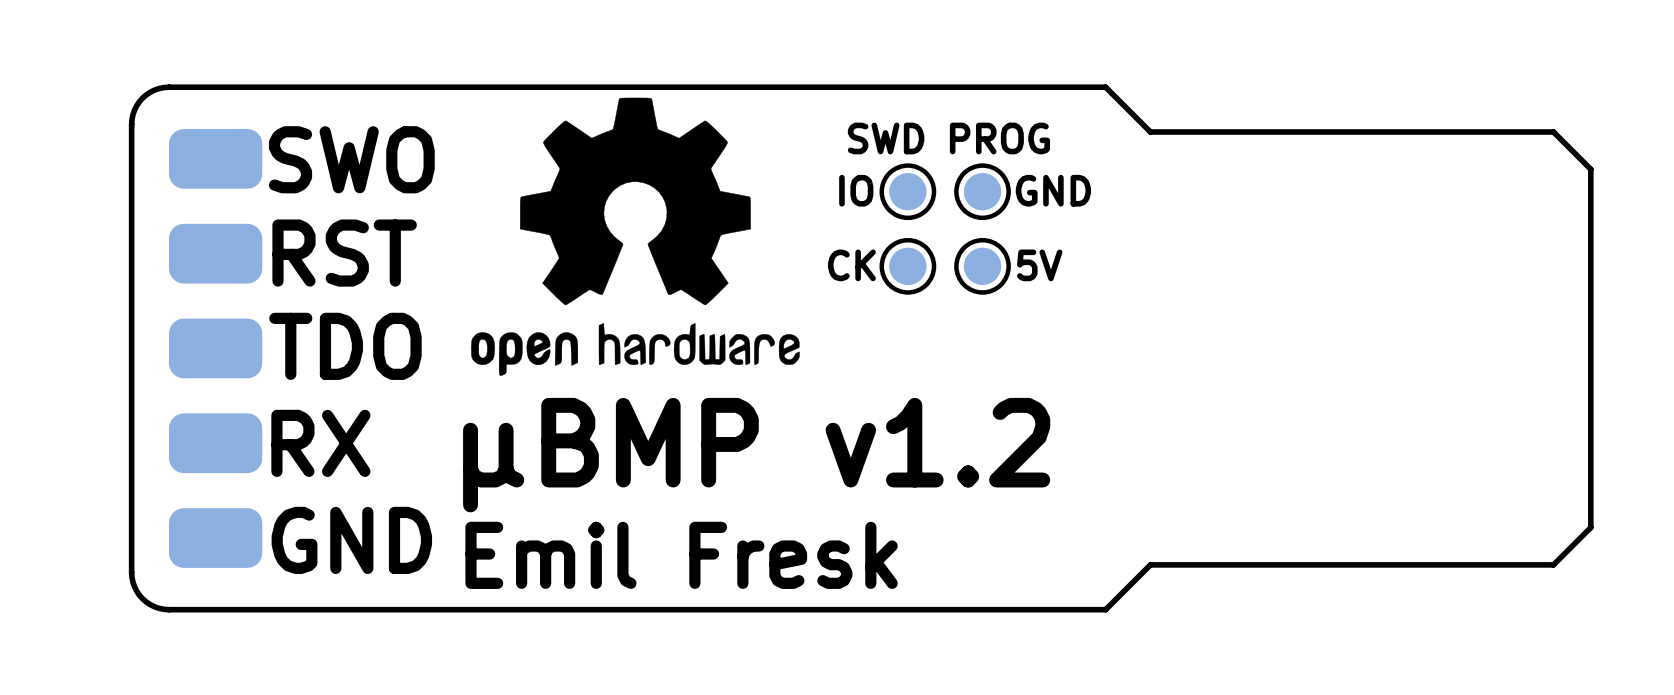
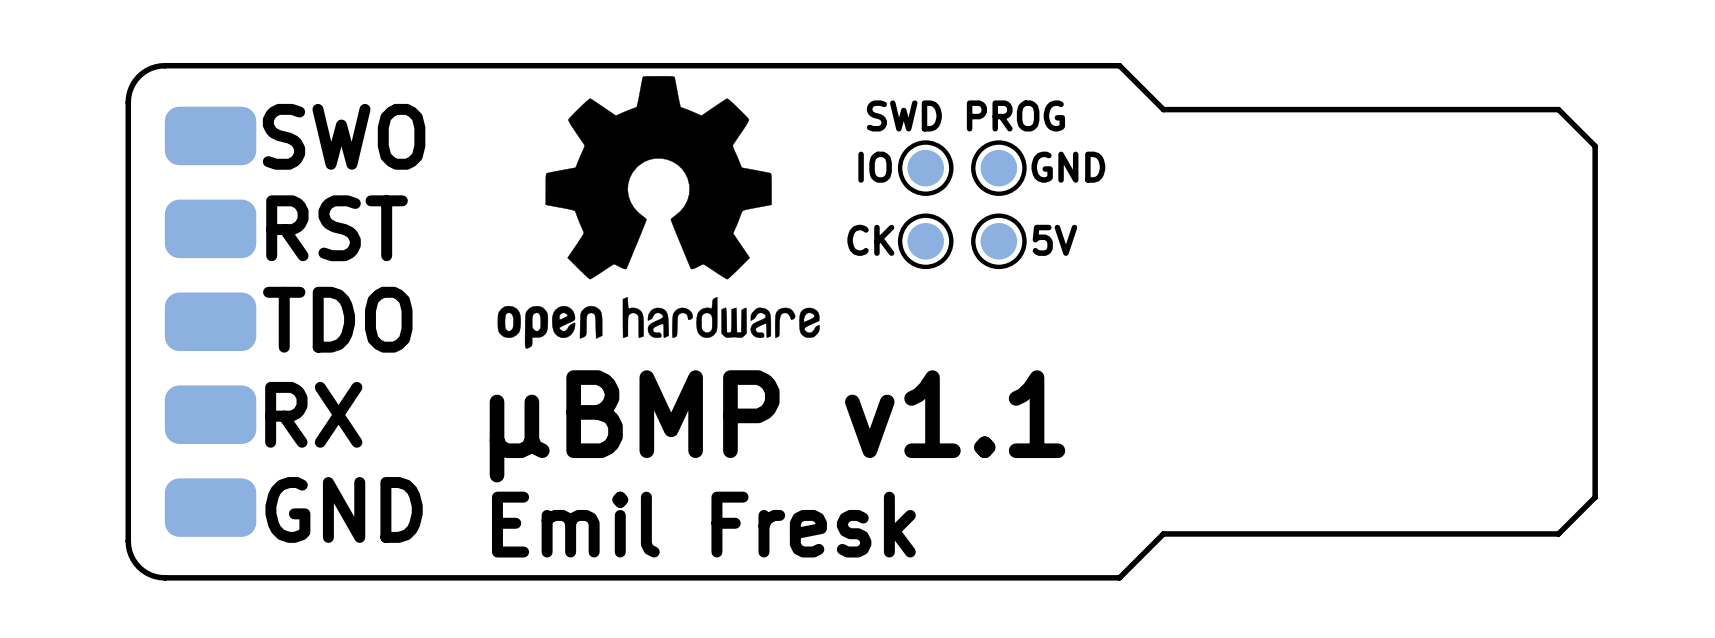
board edge: (168, 87) (154, 90) (142, 98) (134, 110) (131, 124) (131, 577) (134, 586) (142, 598) (154, 606) (168, 609) -> (201, 65) (160, 66) (146, 70) (133, 84) (128, 102) (128, 546) (135, 563) (150, 575) (164, 577) (201, 577)
text position: SWO (351, 159) -> SWO (344, 136)
text position: RST (344, 253) -> RST (337, 228)
text position: TDO (345, 346) -> TDO (337, 319)
part position: (215, 348) -> (210, 321)
text position: RX (320, 443) -> RX (313, 414)
text: µBMP v1.2 (756, 455) -> µBMP v1.1 (777, 426)
text position: GND (351, 540) -> GND (344, 509)

